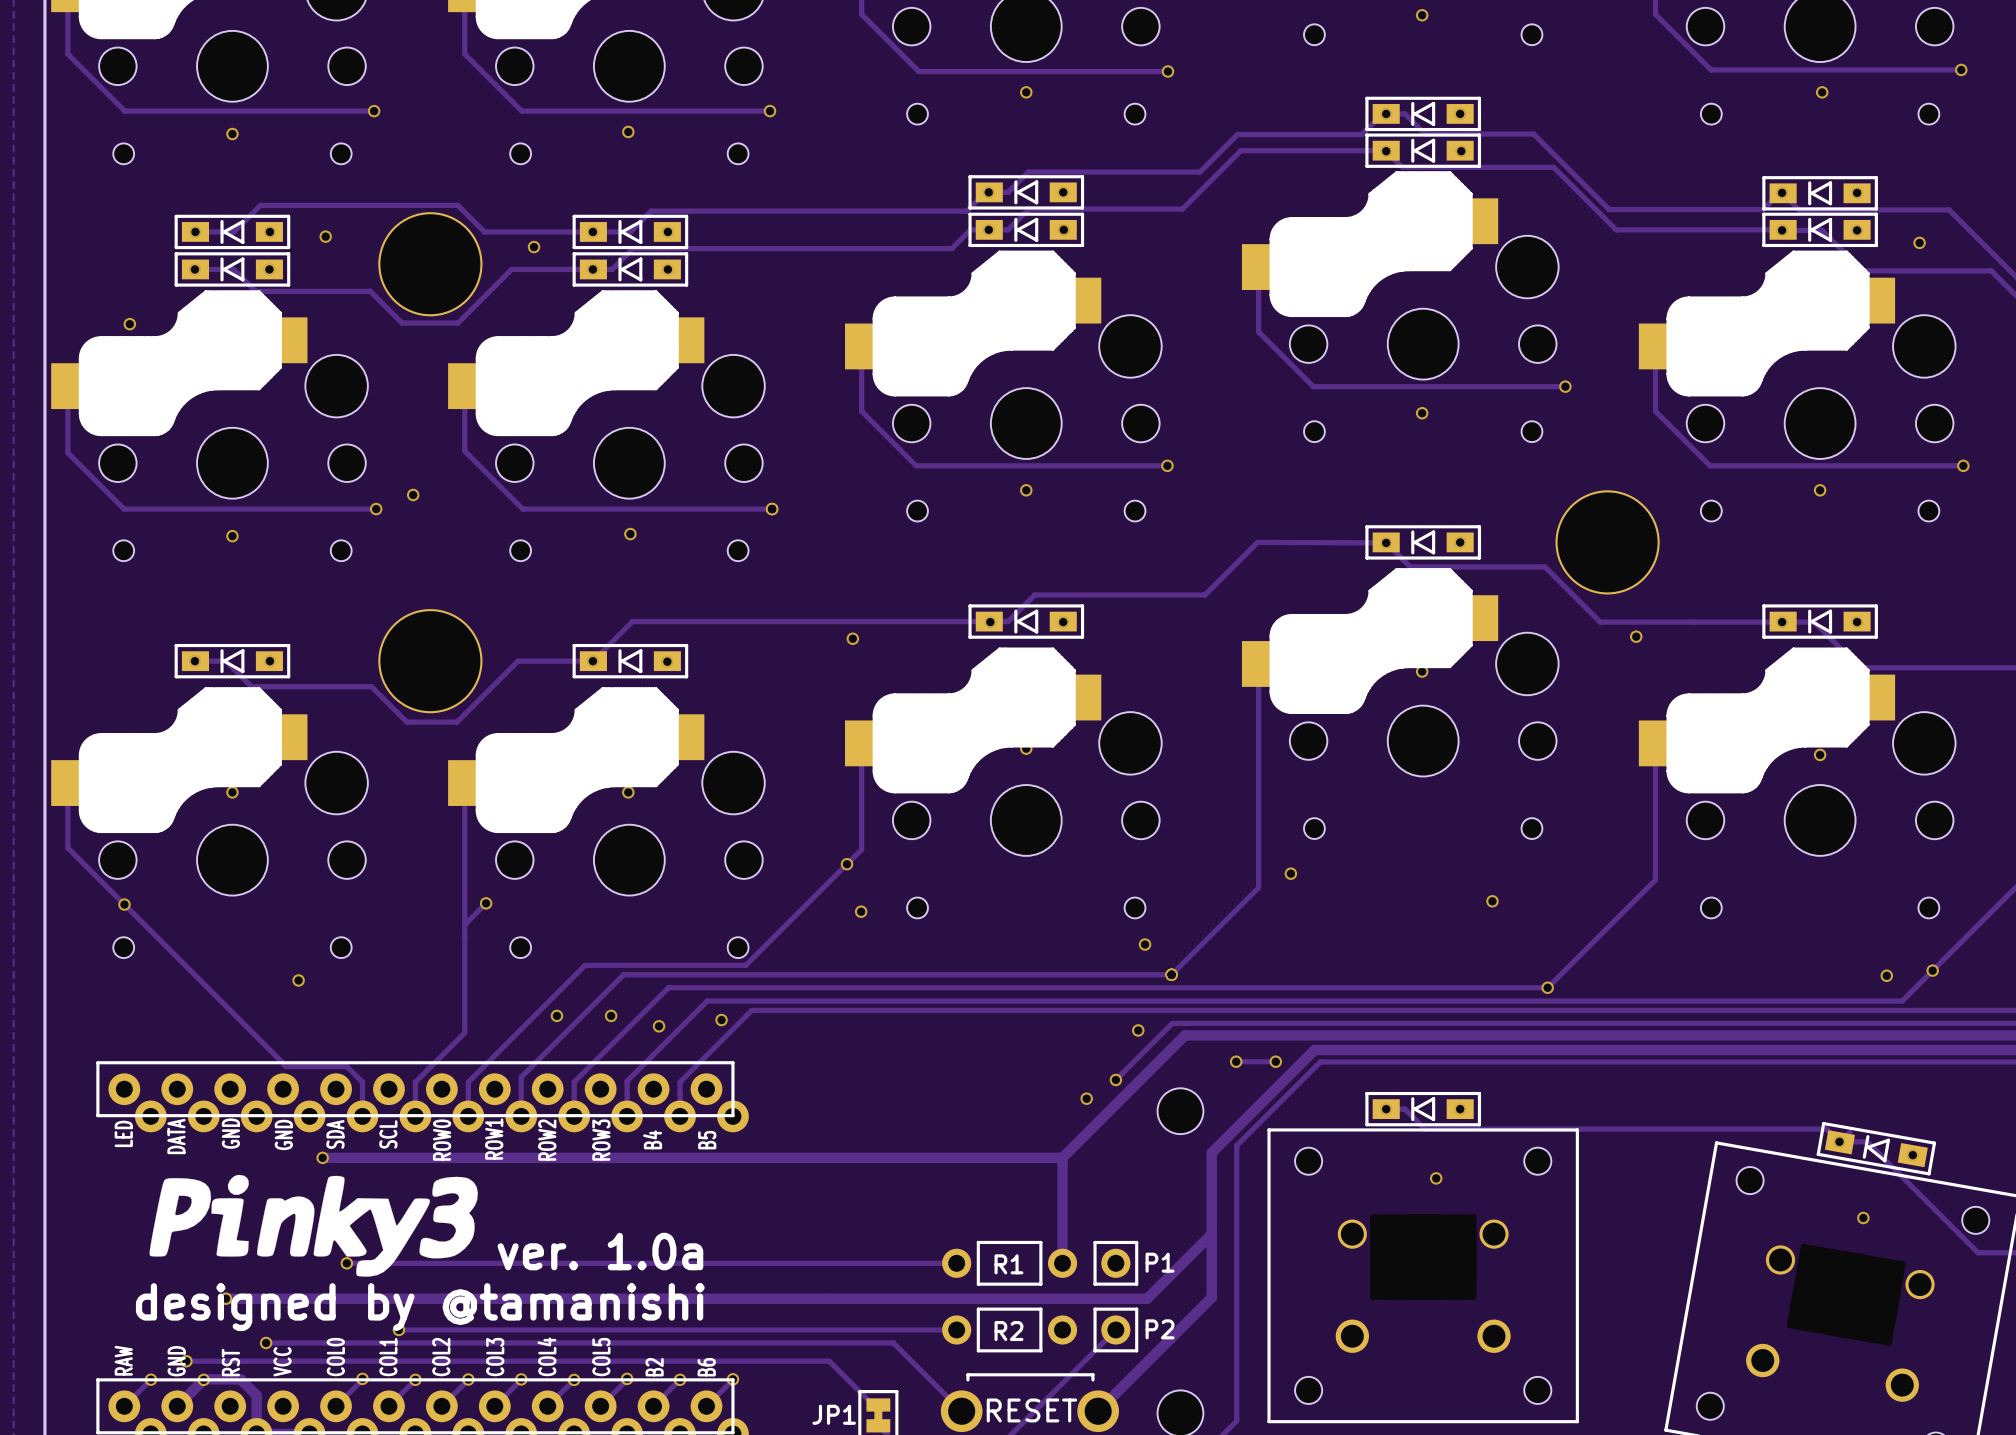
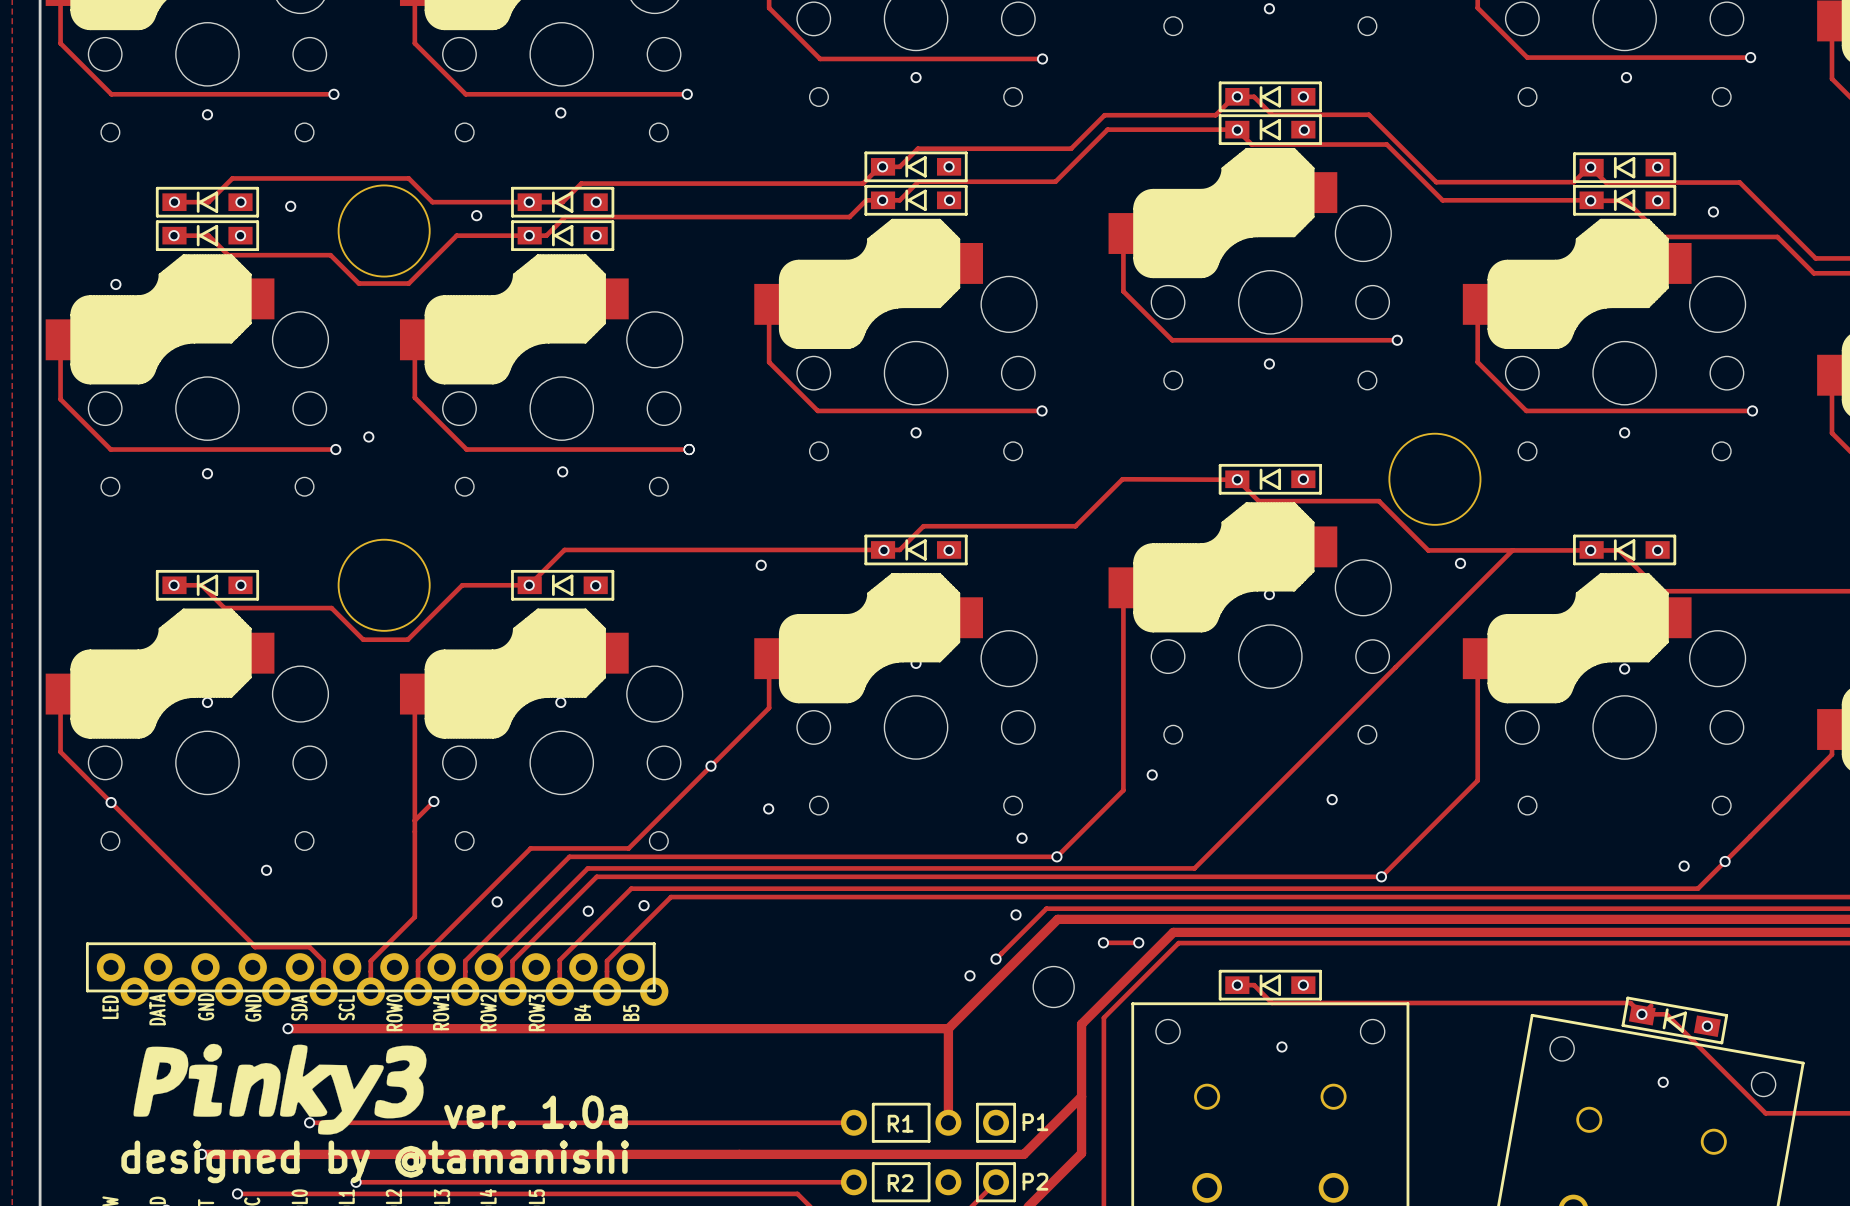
track: none -> (1512, 550) (1194, 868) (587, 868) (488, 967)
track: (861, 798) (861, 849) (745, 965) -> (769, 708) (628, 848) (530, 848) (522, 856)
via position: (847, 864) -> (711, 766)
track: (1258, 887) (1171, 974) (623, 974) (521, 1077) (521, 1082) -> (1123, 787) (1123, 790) (1056, 856) (665, 856)
track: (585, 965) (638, 965) -> (465, 961) (569, 856)
via position: (1171, 974) -> (1056, 856)
via: (611, 1015) -> none

